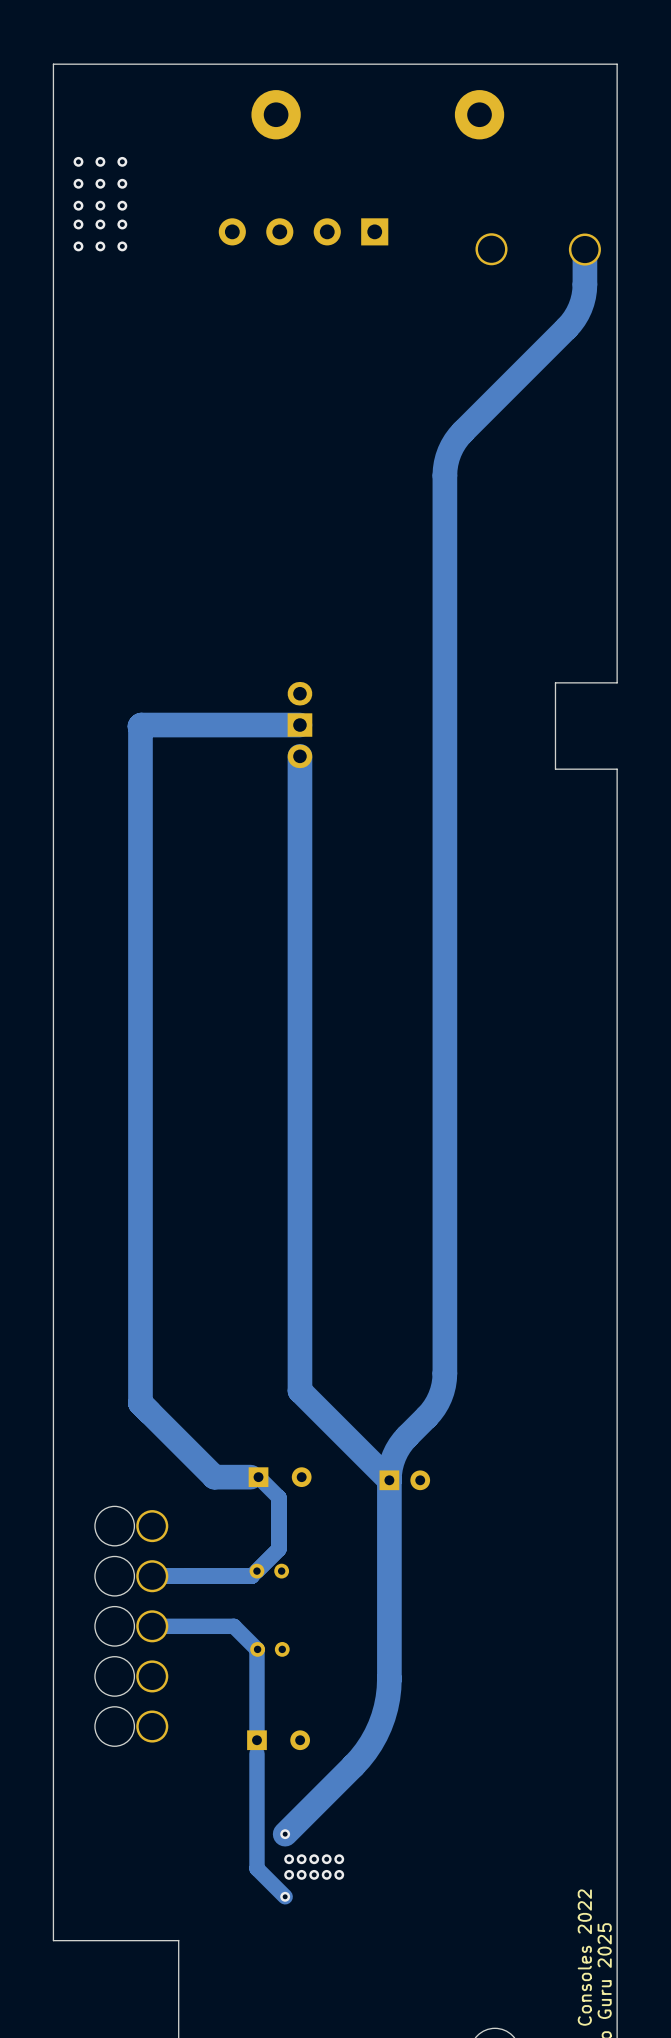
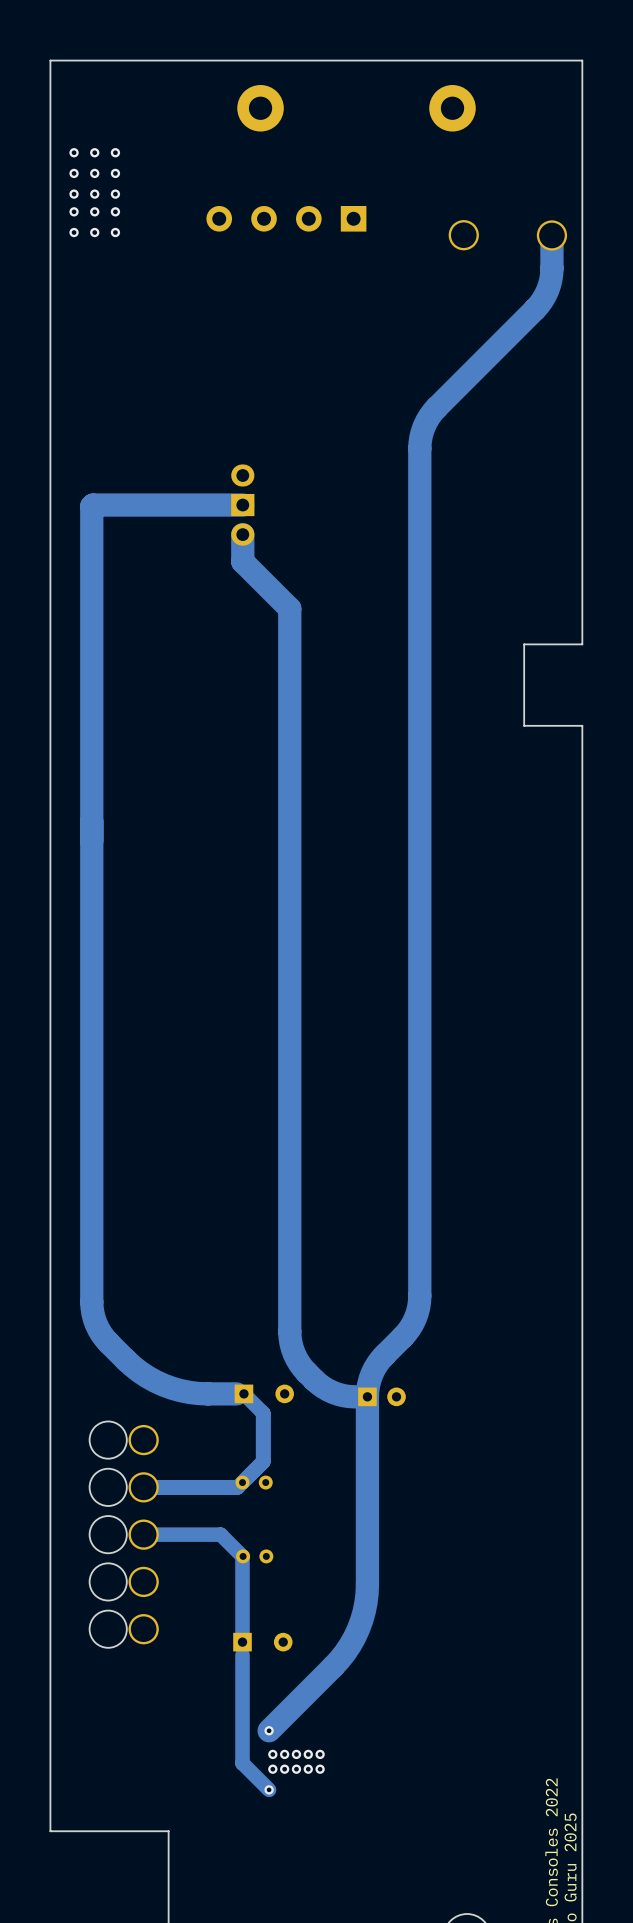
part: none -> (242, 475)
track: none -> (242, 534) (242, 561) (289, 608) (289, 1331) (294, 1353) (306, 1372)
part: none -> (242, 534)
part: (299, 693) -> none
track: (299, 725) (139, 726) (140, 1403) (214, 1477) (220, 1477) -> (242, 505) (91, 506) (92, 1307) (94, 1318) (101, 1334) (139, 1371) (171, 1388) (207, 1393)
part position: (299, 725) -> (242, 505)
track: (299, 756) (299, 1390) (389, 1480) -> (306, 1372) (318, 1383) (332, 1392) (349, 1396) (367, 1396)
part: (299, 756) -> none

